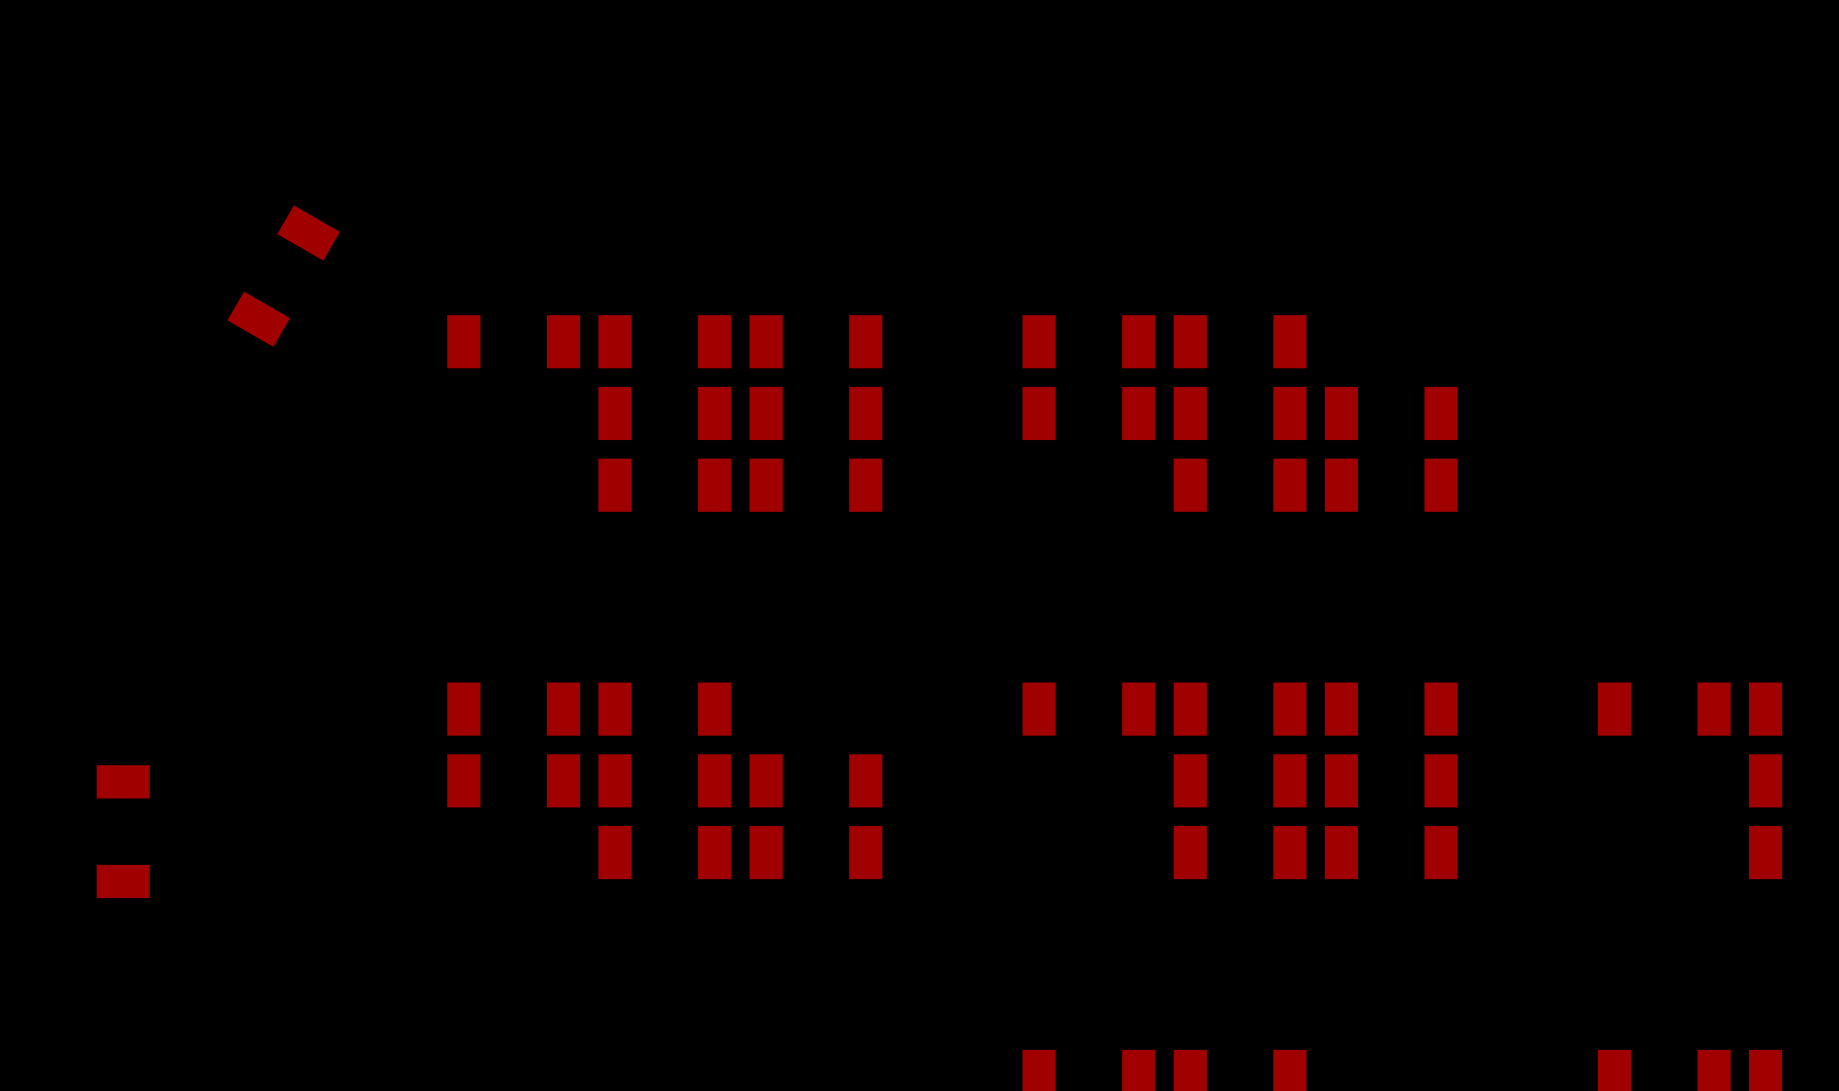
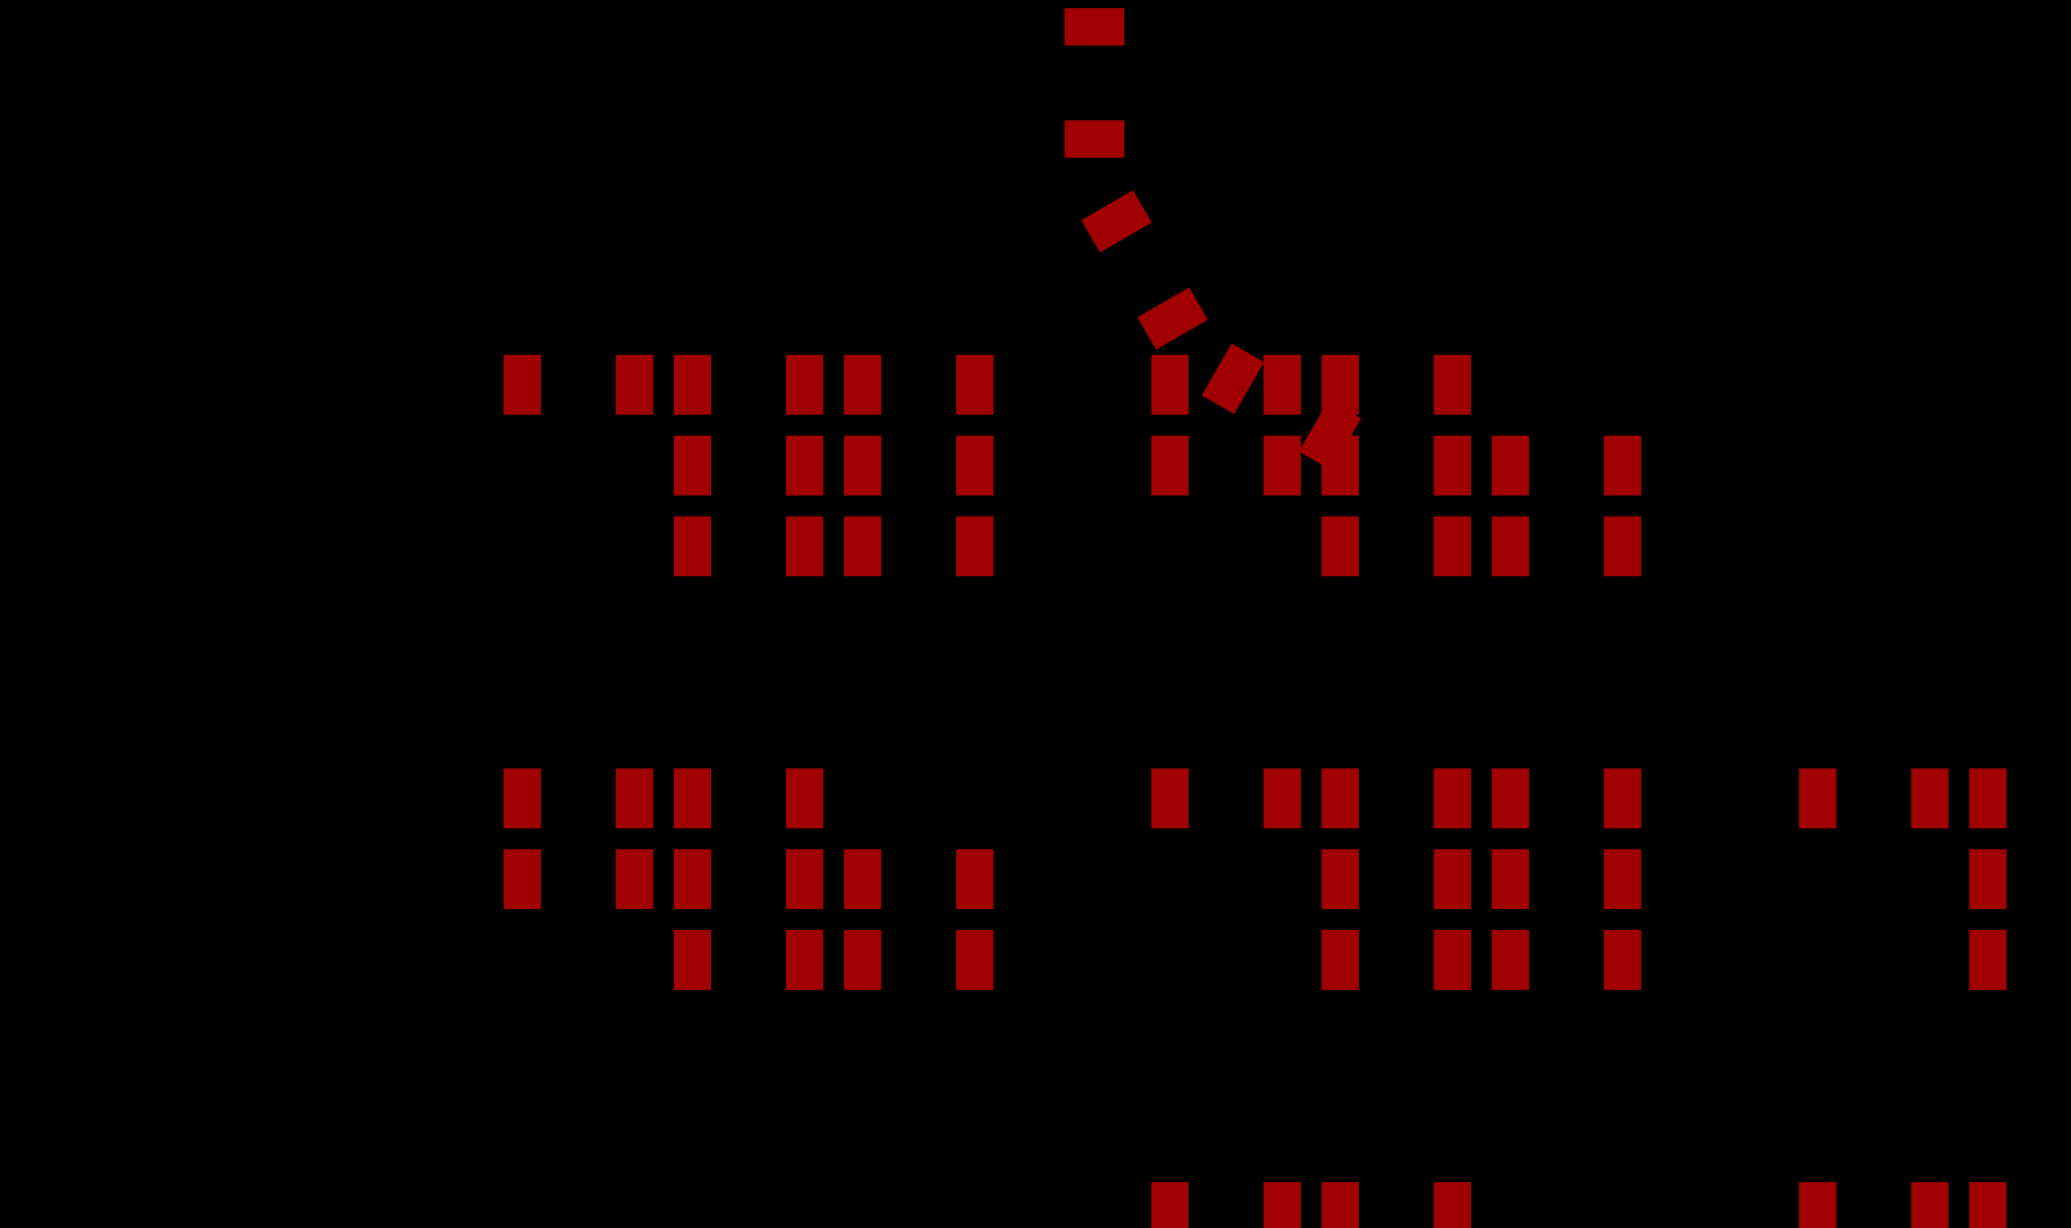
part: none -> (1094, 82)
part: none -> (1144, 269)
part: (283, 276) -> none
part: none -> (1281, 406)
part: (123, 831) -> none

